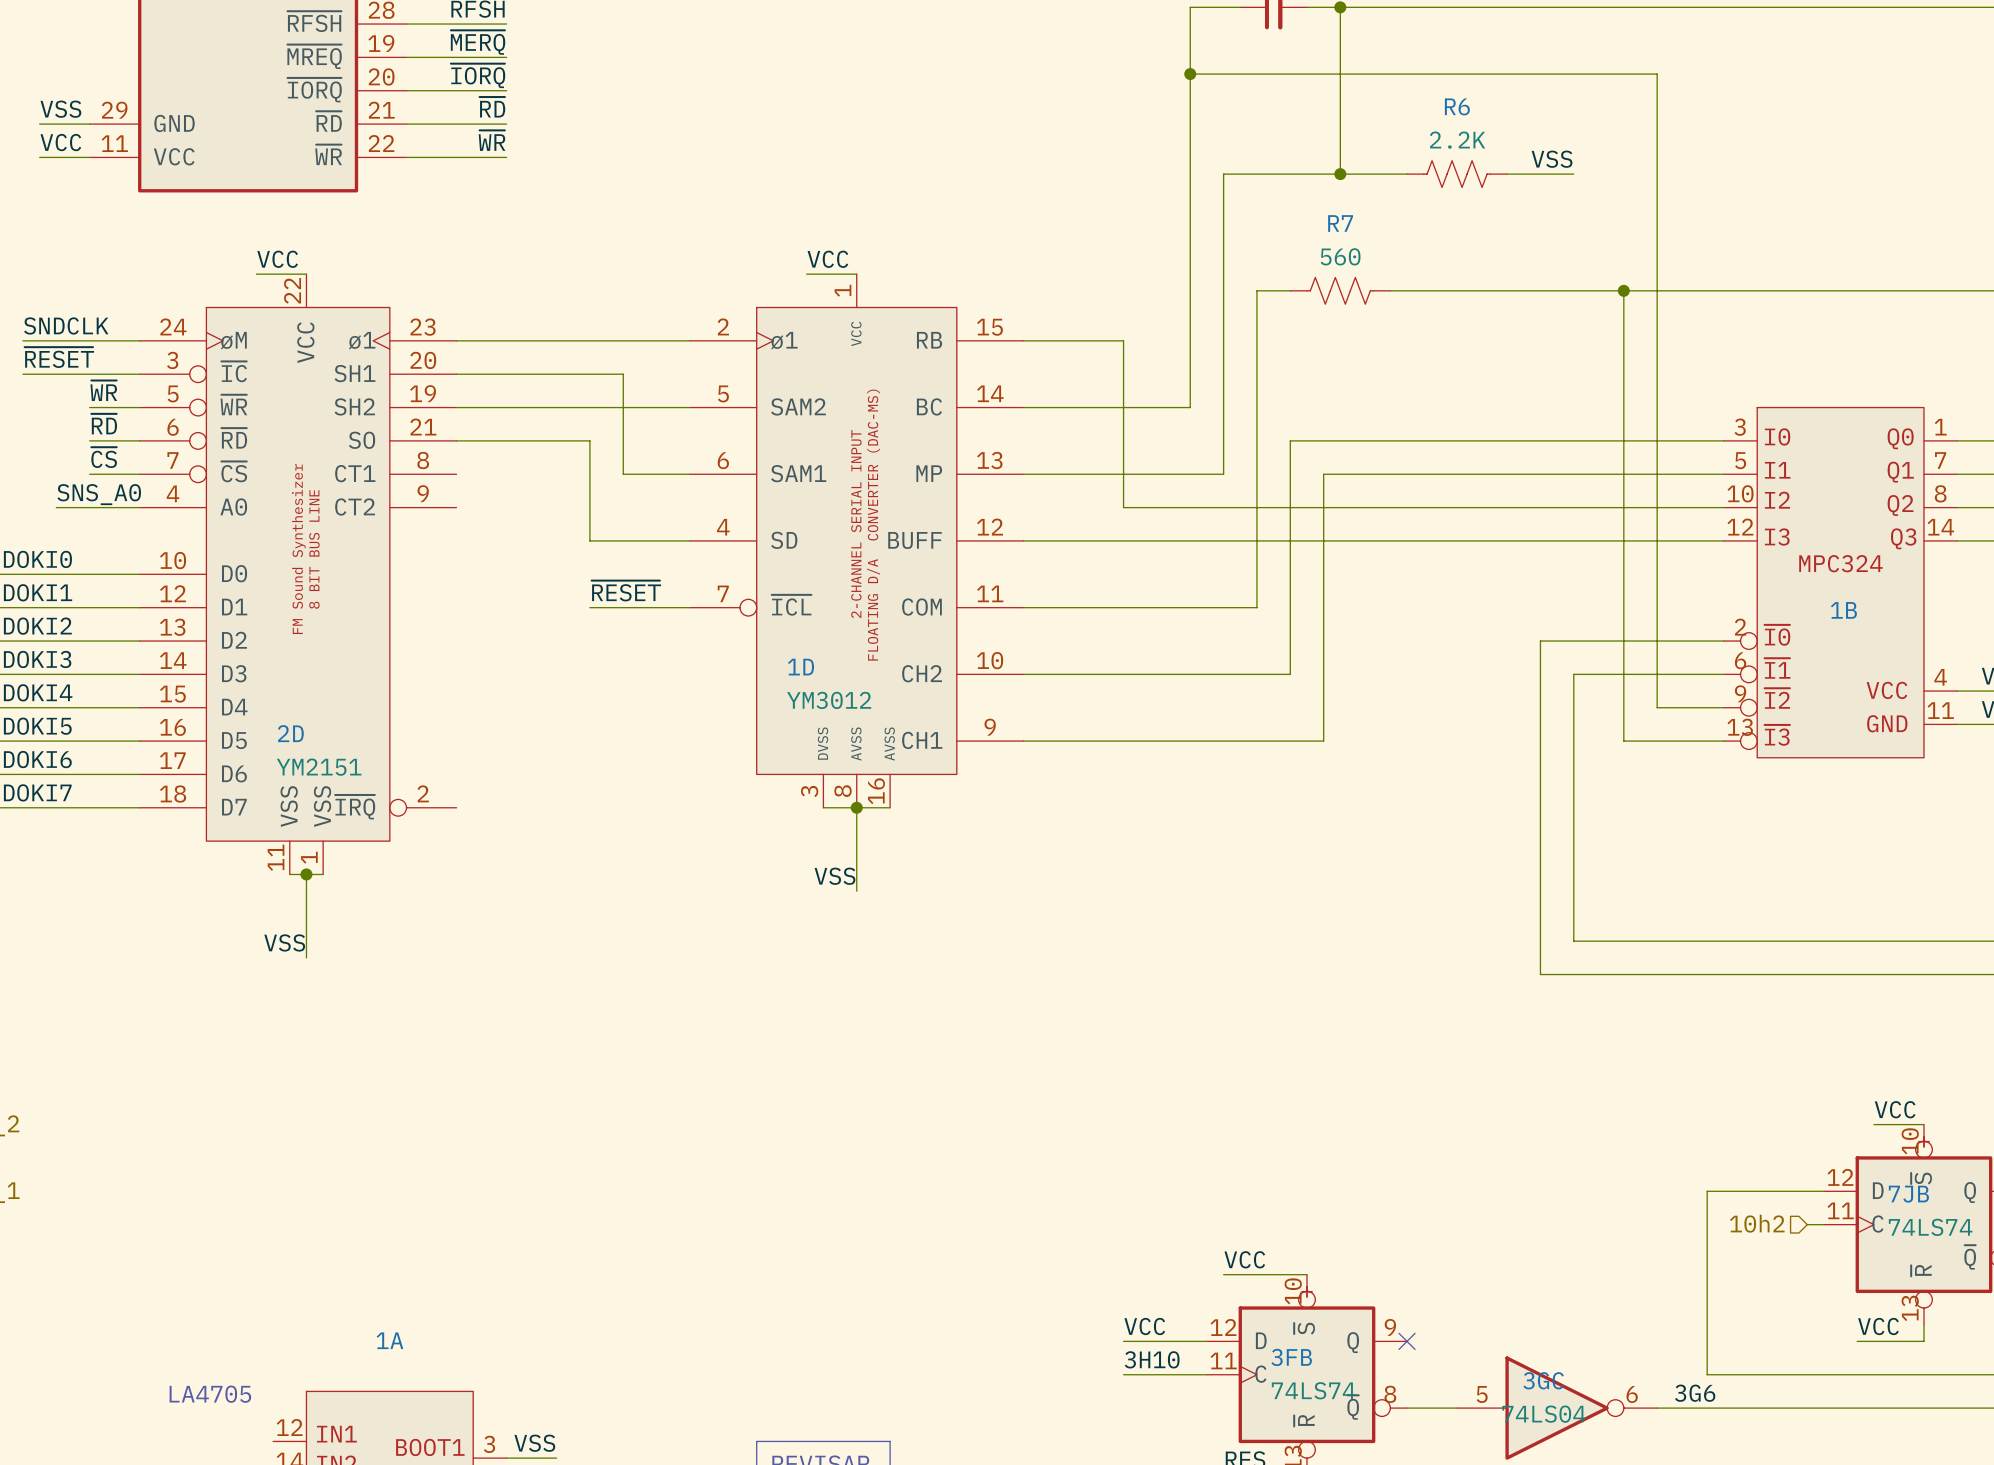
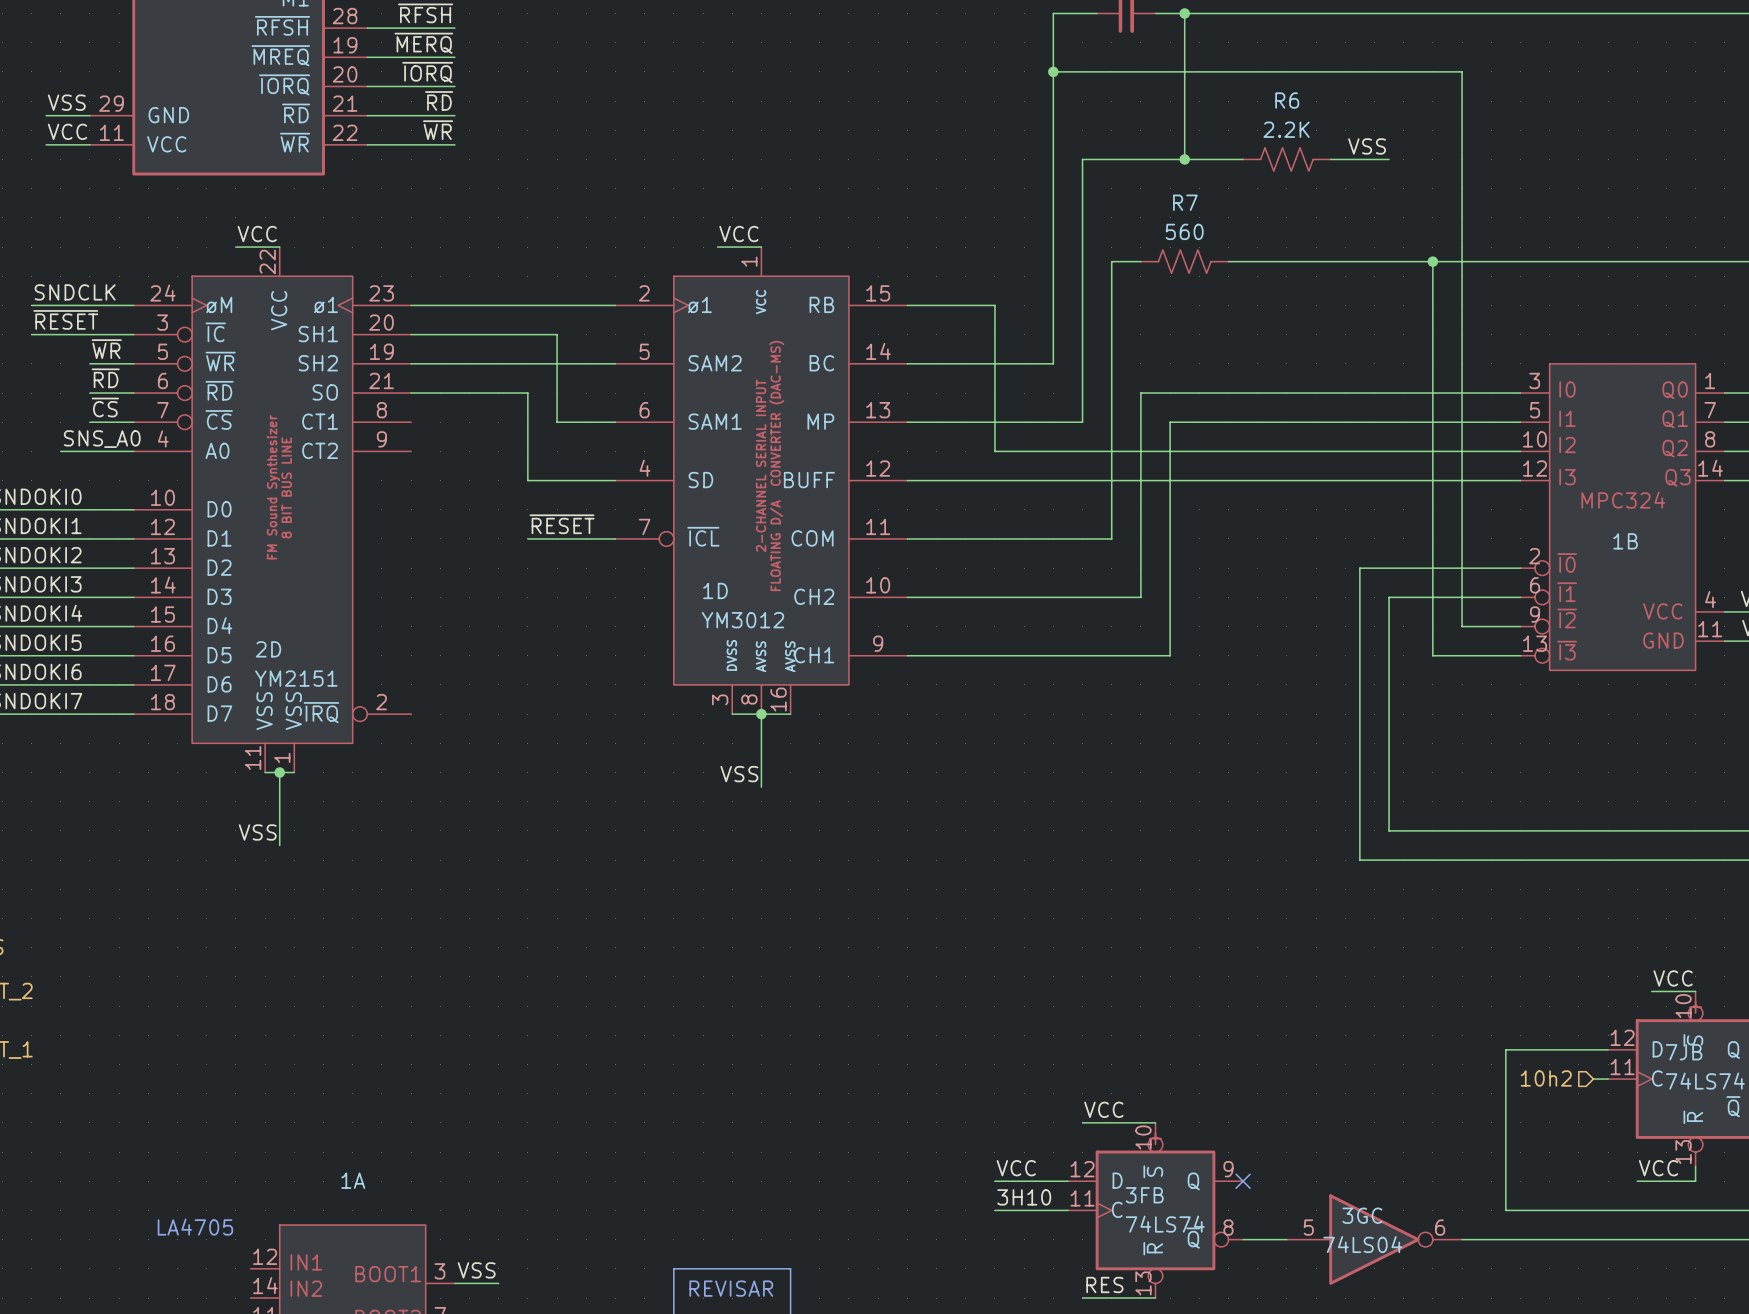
label: 3G6 (1695, 1393) -> none

